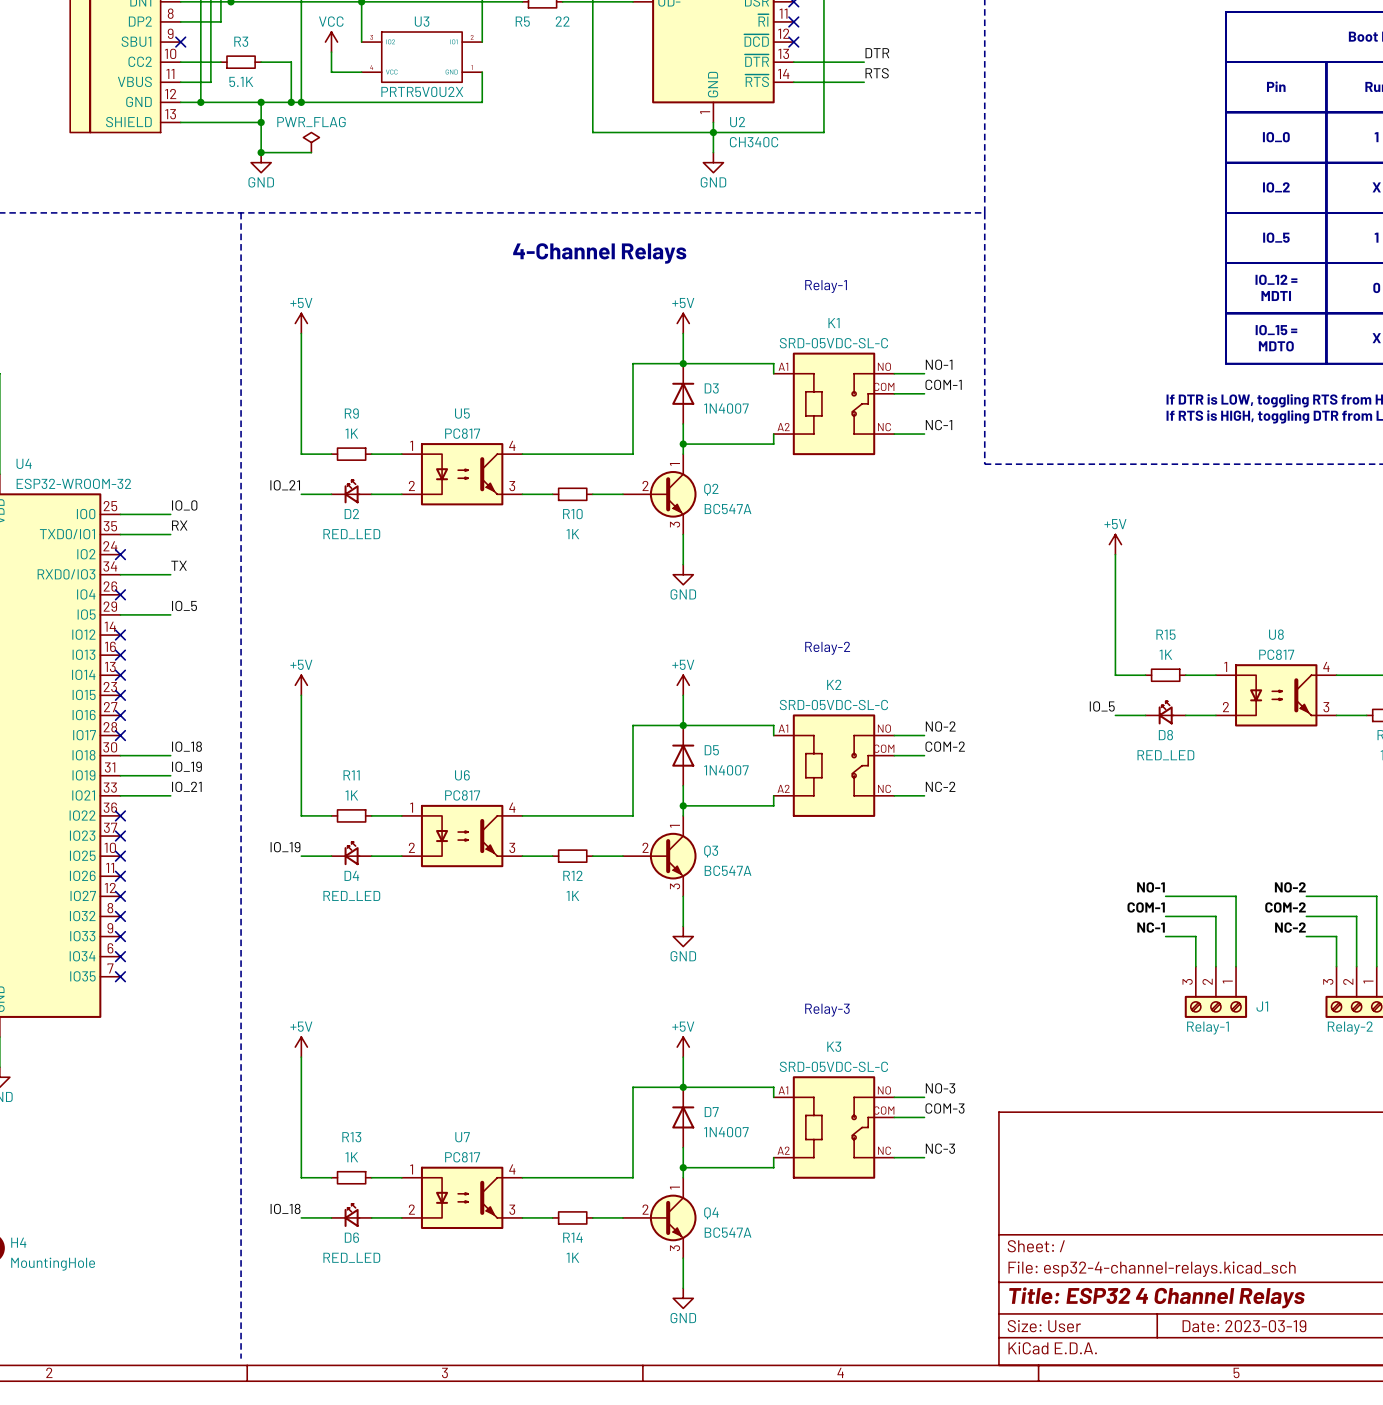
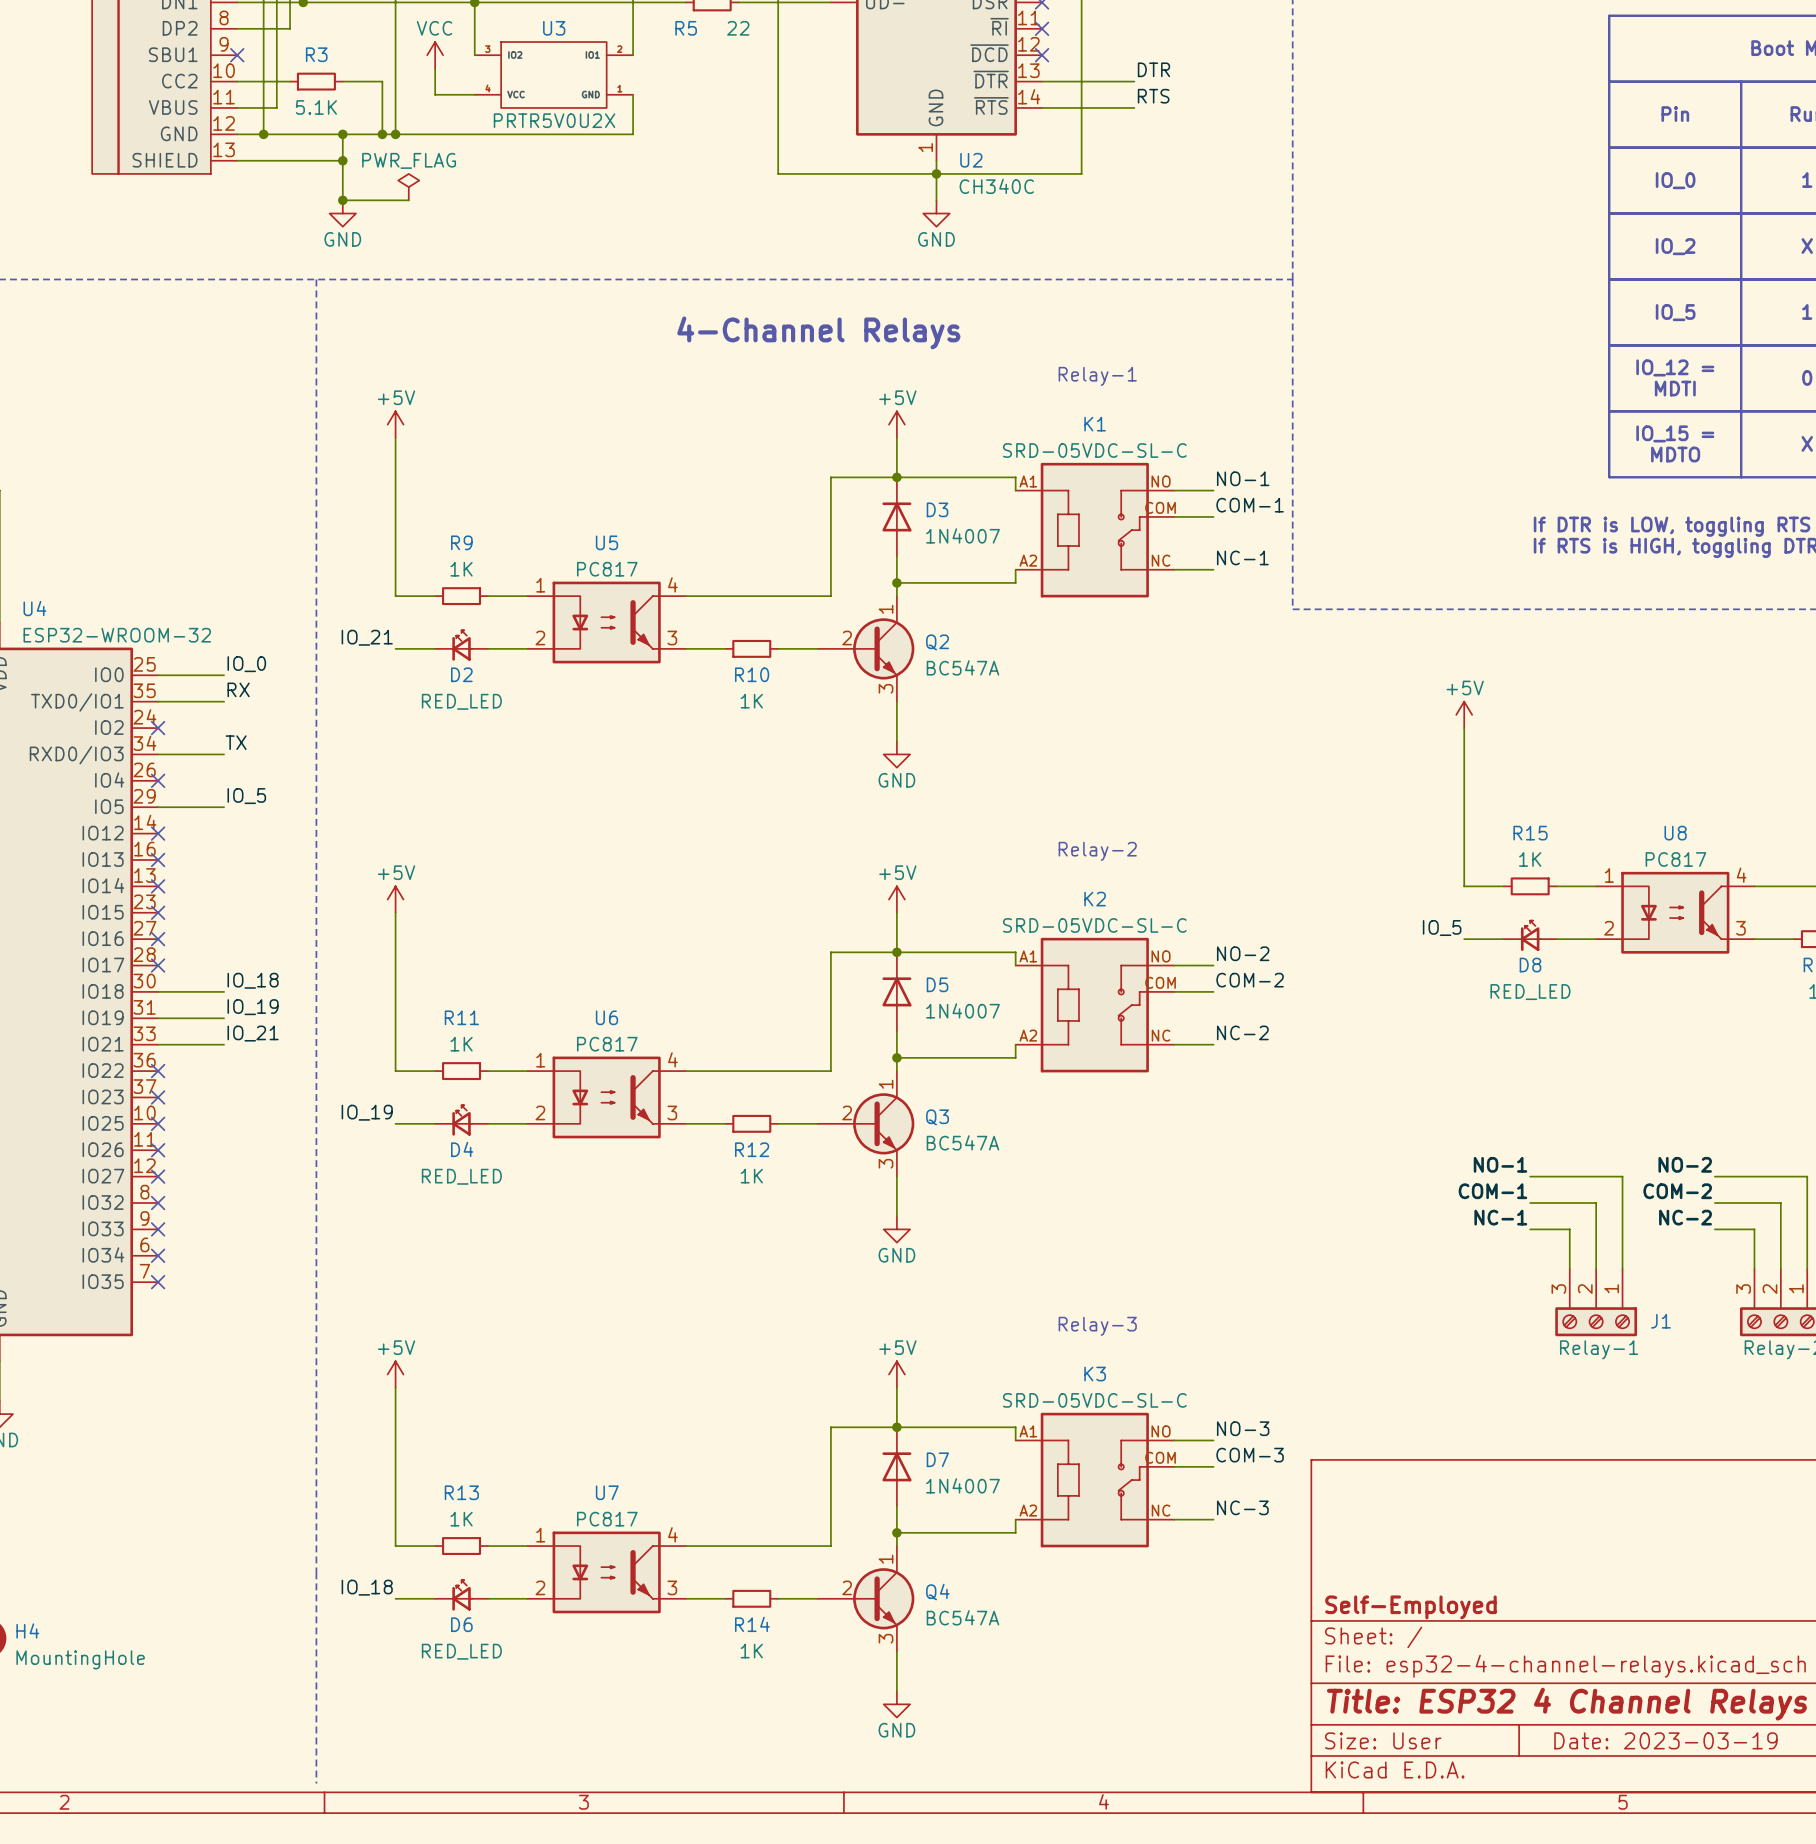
title block: none -> Self-Employed (1410, 1607)

